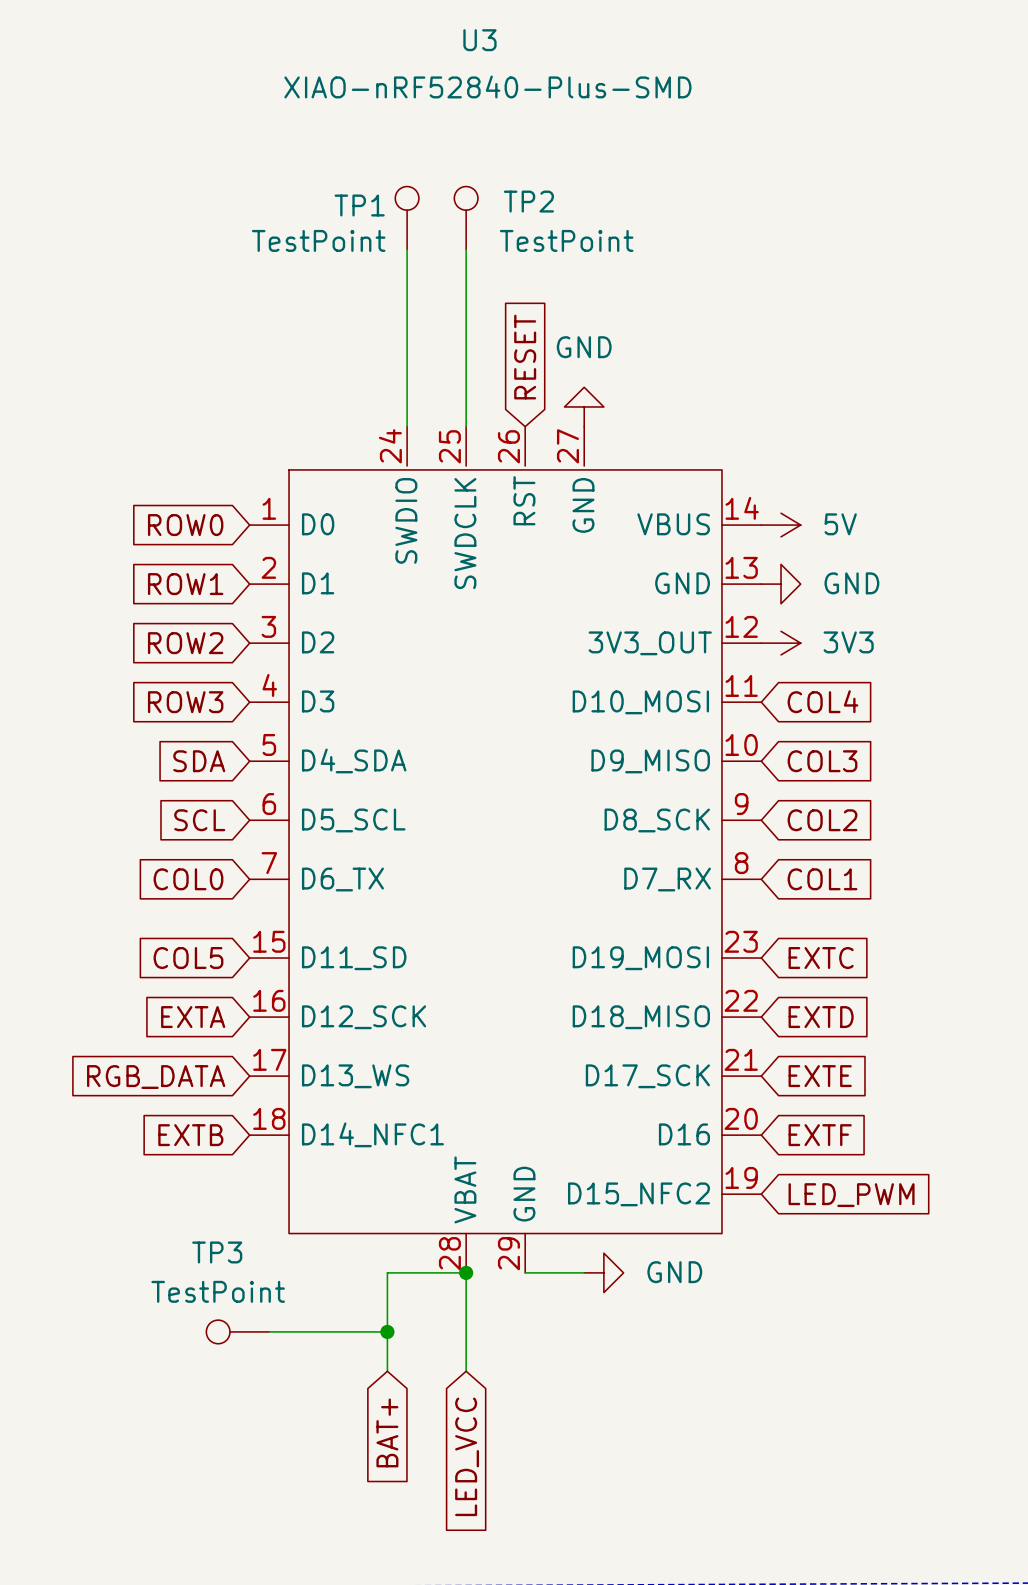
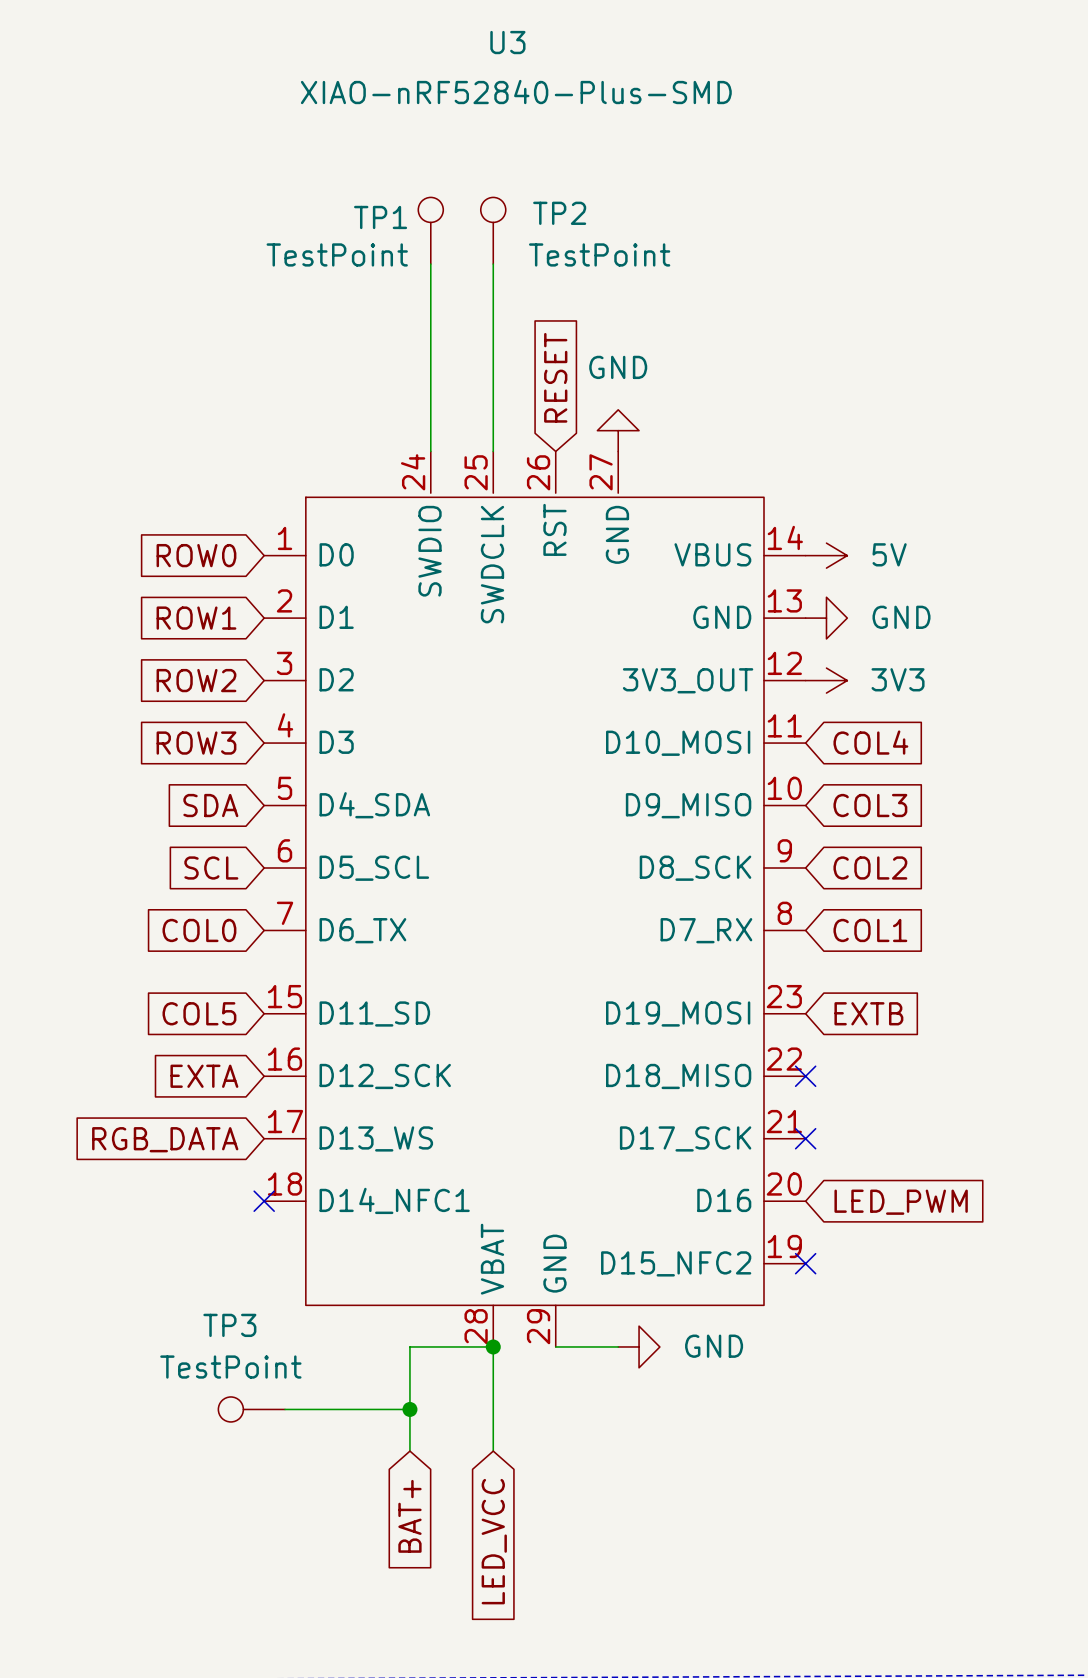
global label: EXTC (821, 958) -> EXTB (868, 1013)
no-connect mark: none -> (805, 1076)
global label: EXTD (821, 1017) -> none
no-connect mark: none -> (805, 1138)
global label: EXTE (820, 1076) -> none
global label: EXTB (190, 1135) -> none
no-connect mark: none -> (264, 1201)
global label: EXTF (820, 1135) -> LED_PWM (901, 1202)
no-connect mark: none -> (805, 1263)
global label: LED_PWM (851, 1195) -> none

